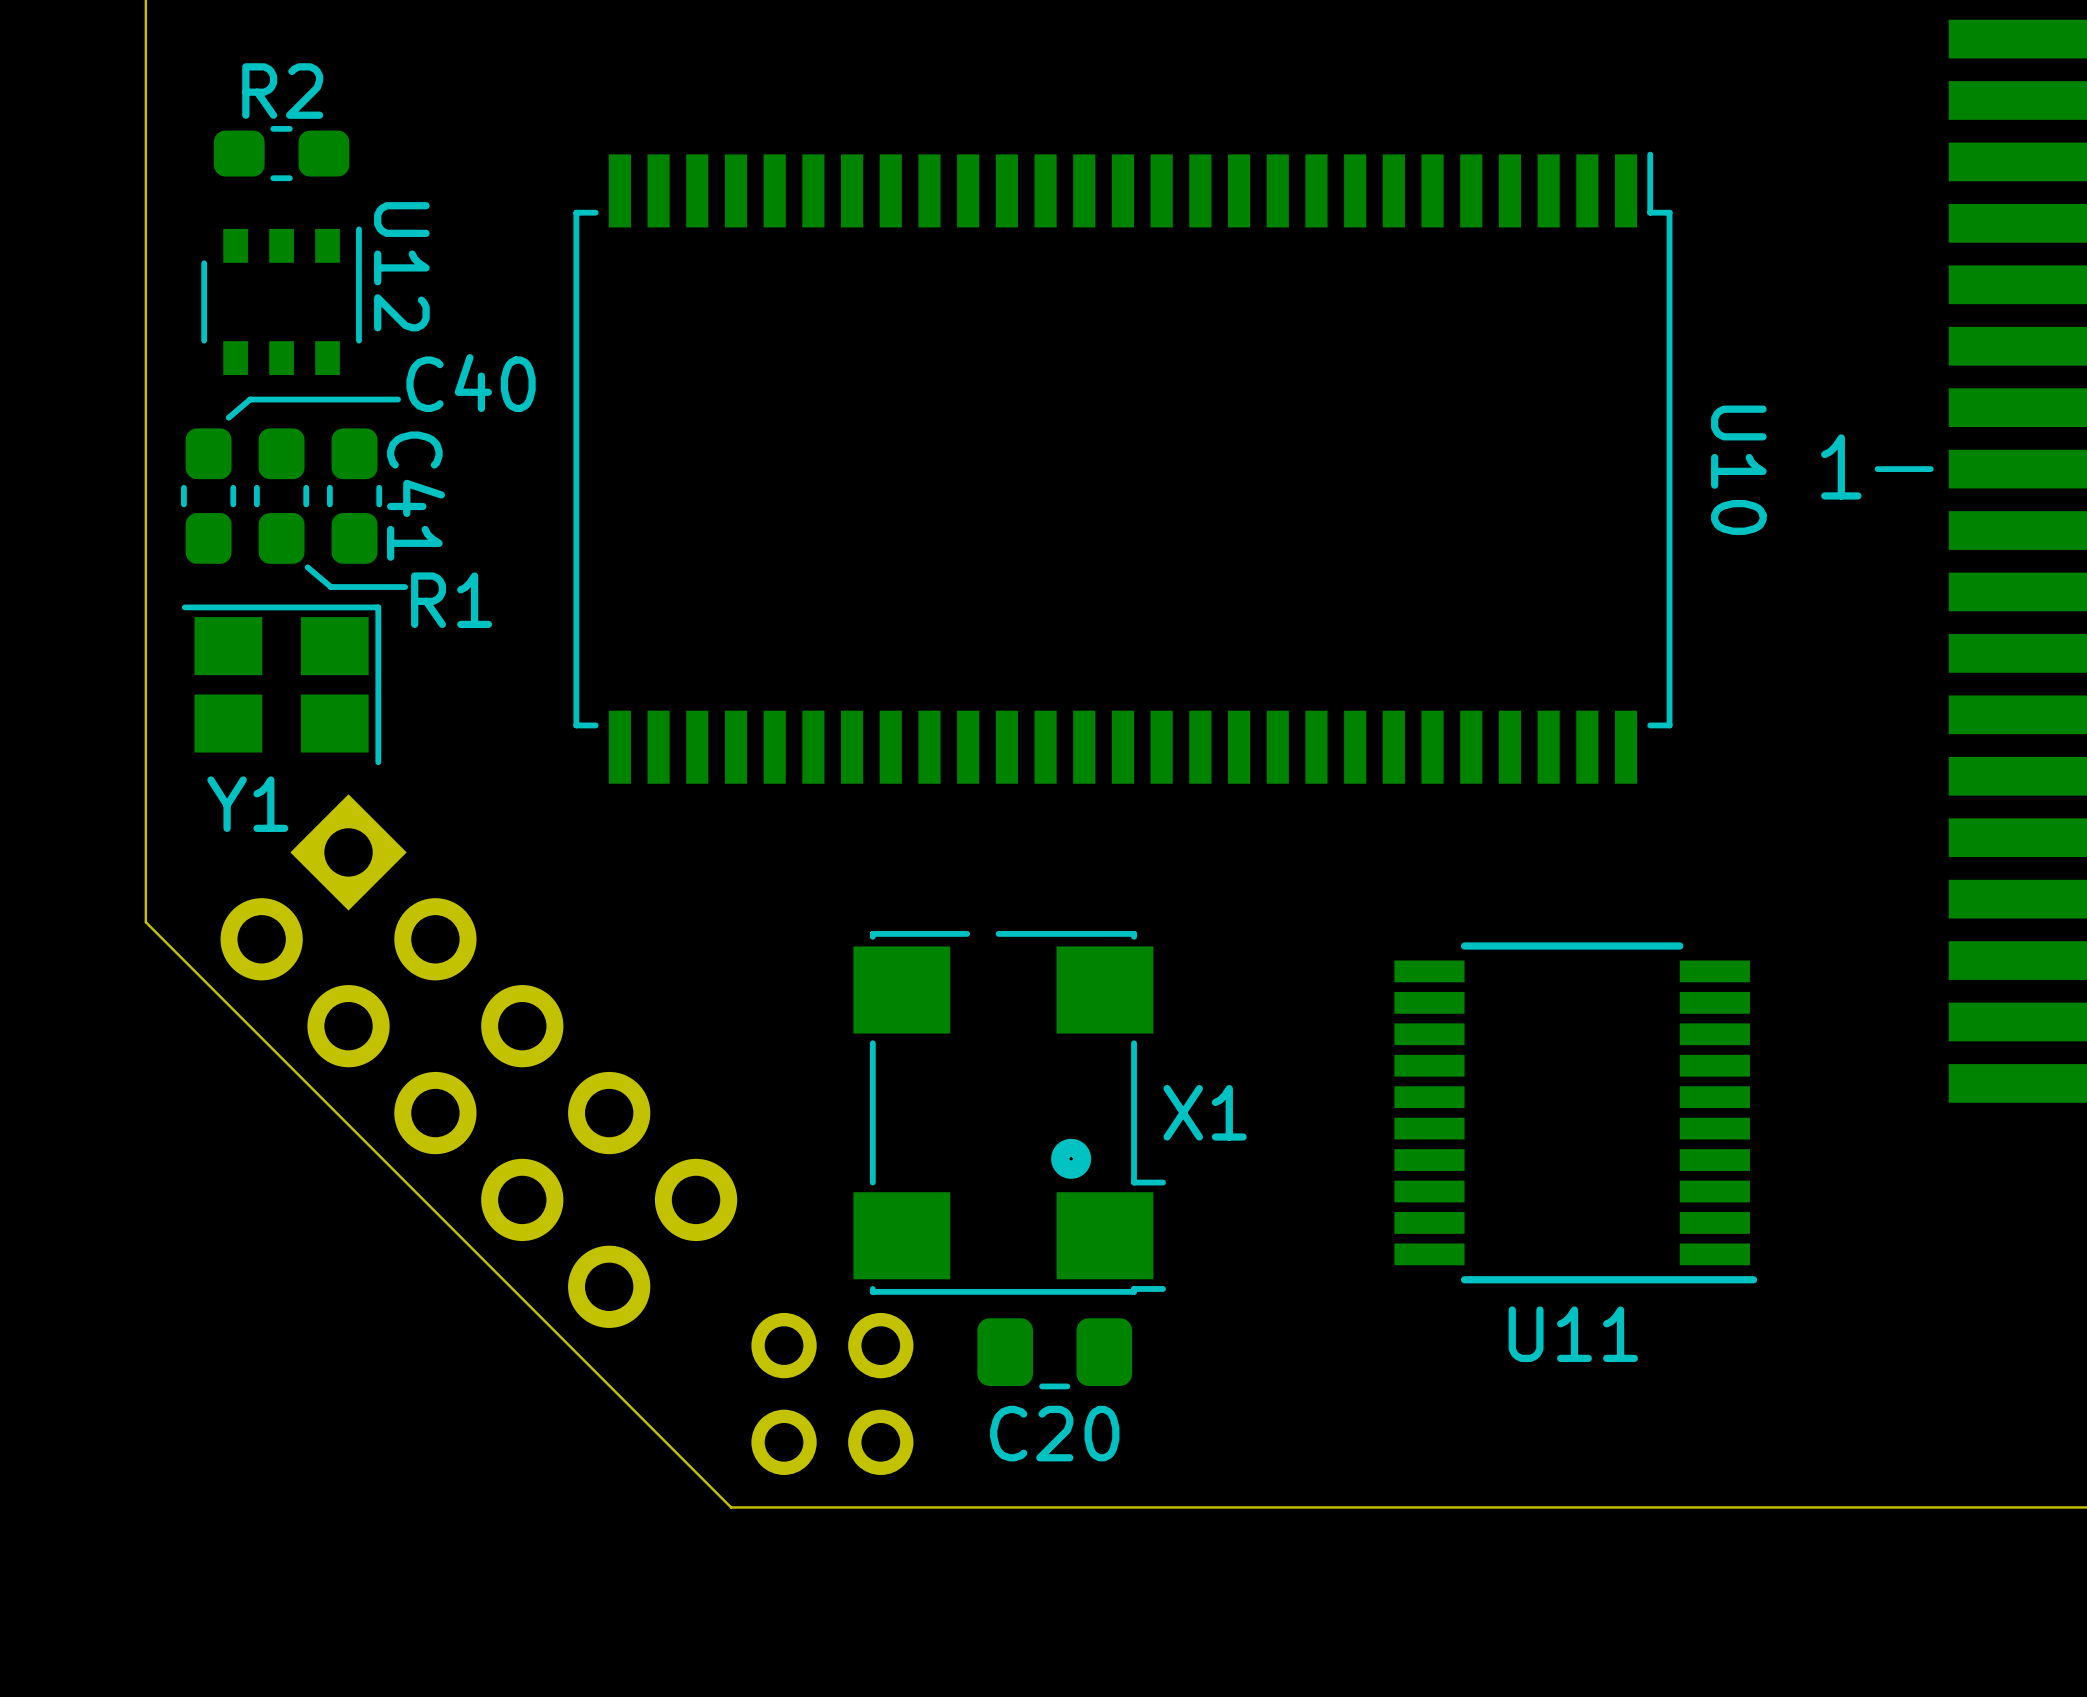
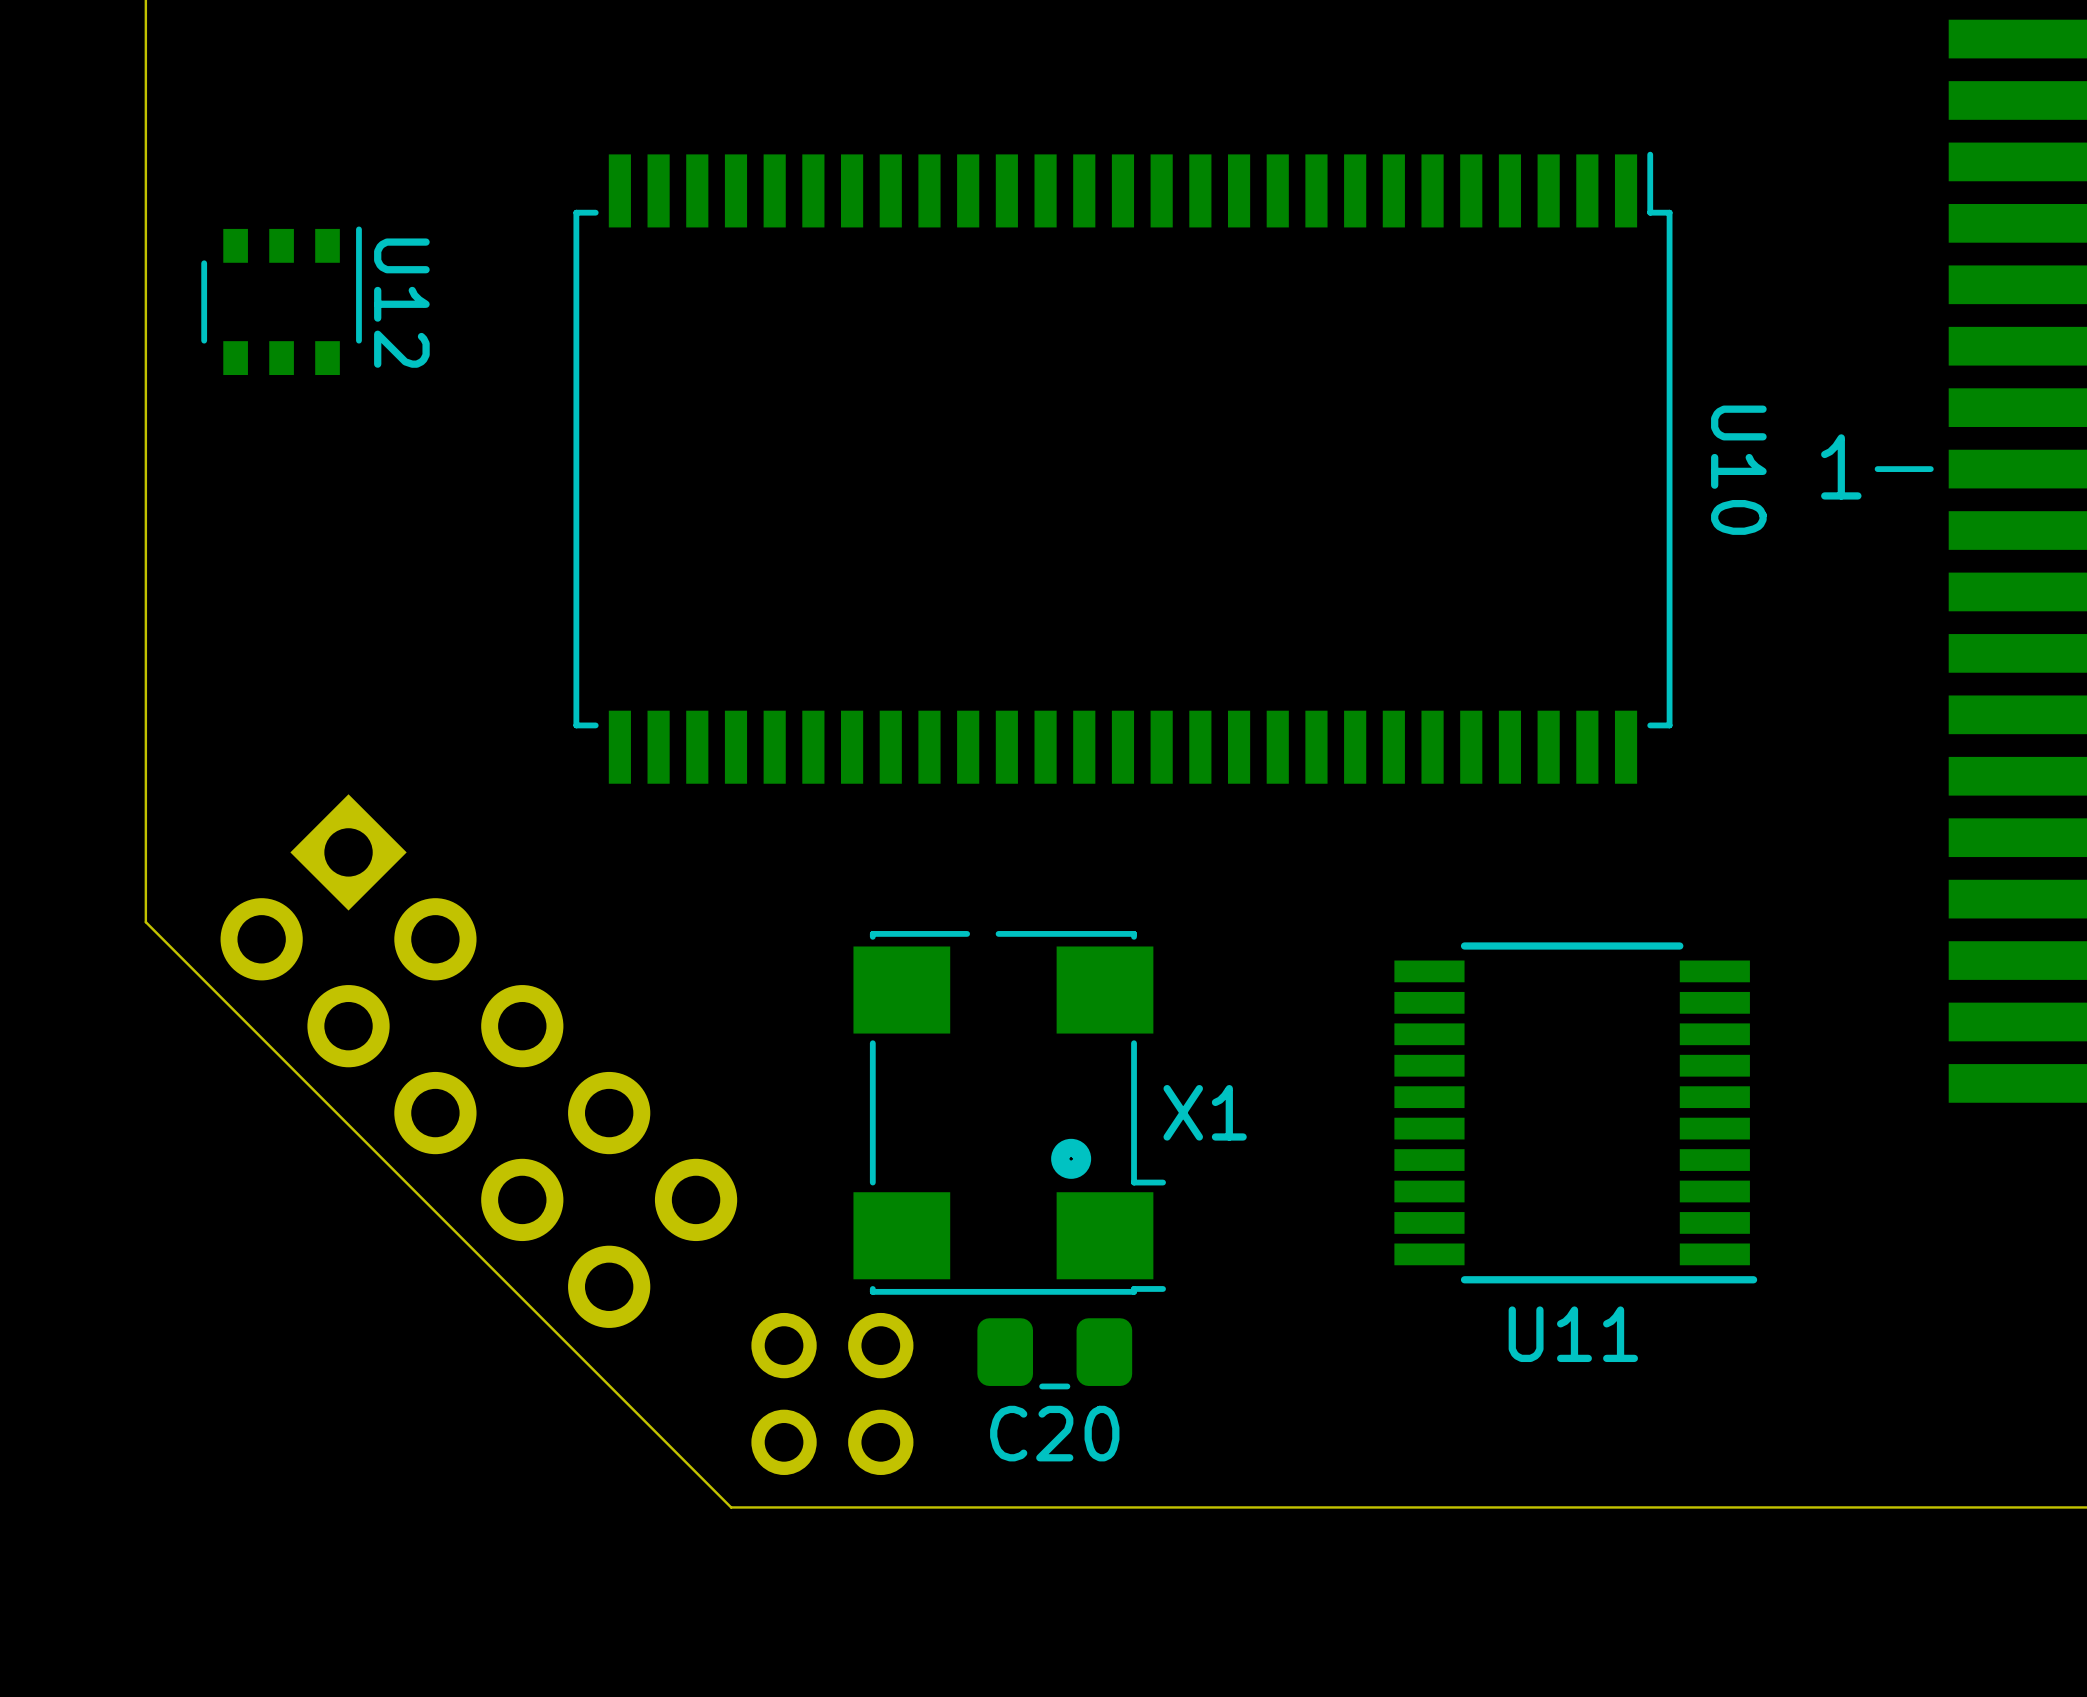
R2: (281, 153) -> none
U12 name position: U12 (401, 266) -> U12 (401, 303)
line: (398, 399) (250, 399) (228, 417) -> none
C40: (208, 496) -> none
R1: (281, 496) -> none
C41: (354, 496) -> none
line: (307, 567) (330, 587) (405, 587) -> none
Y1: (281, 684) -> none

